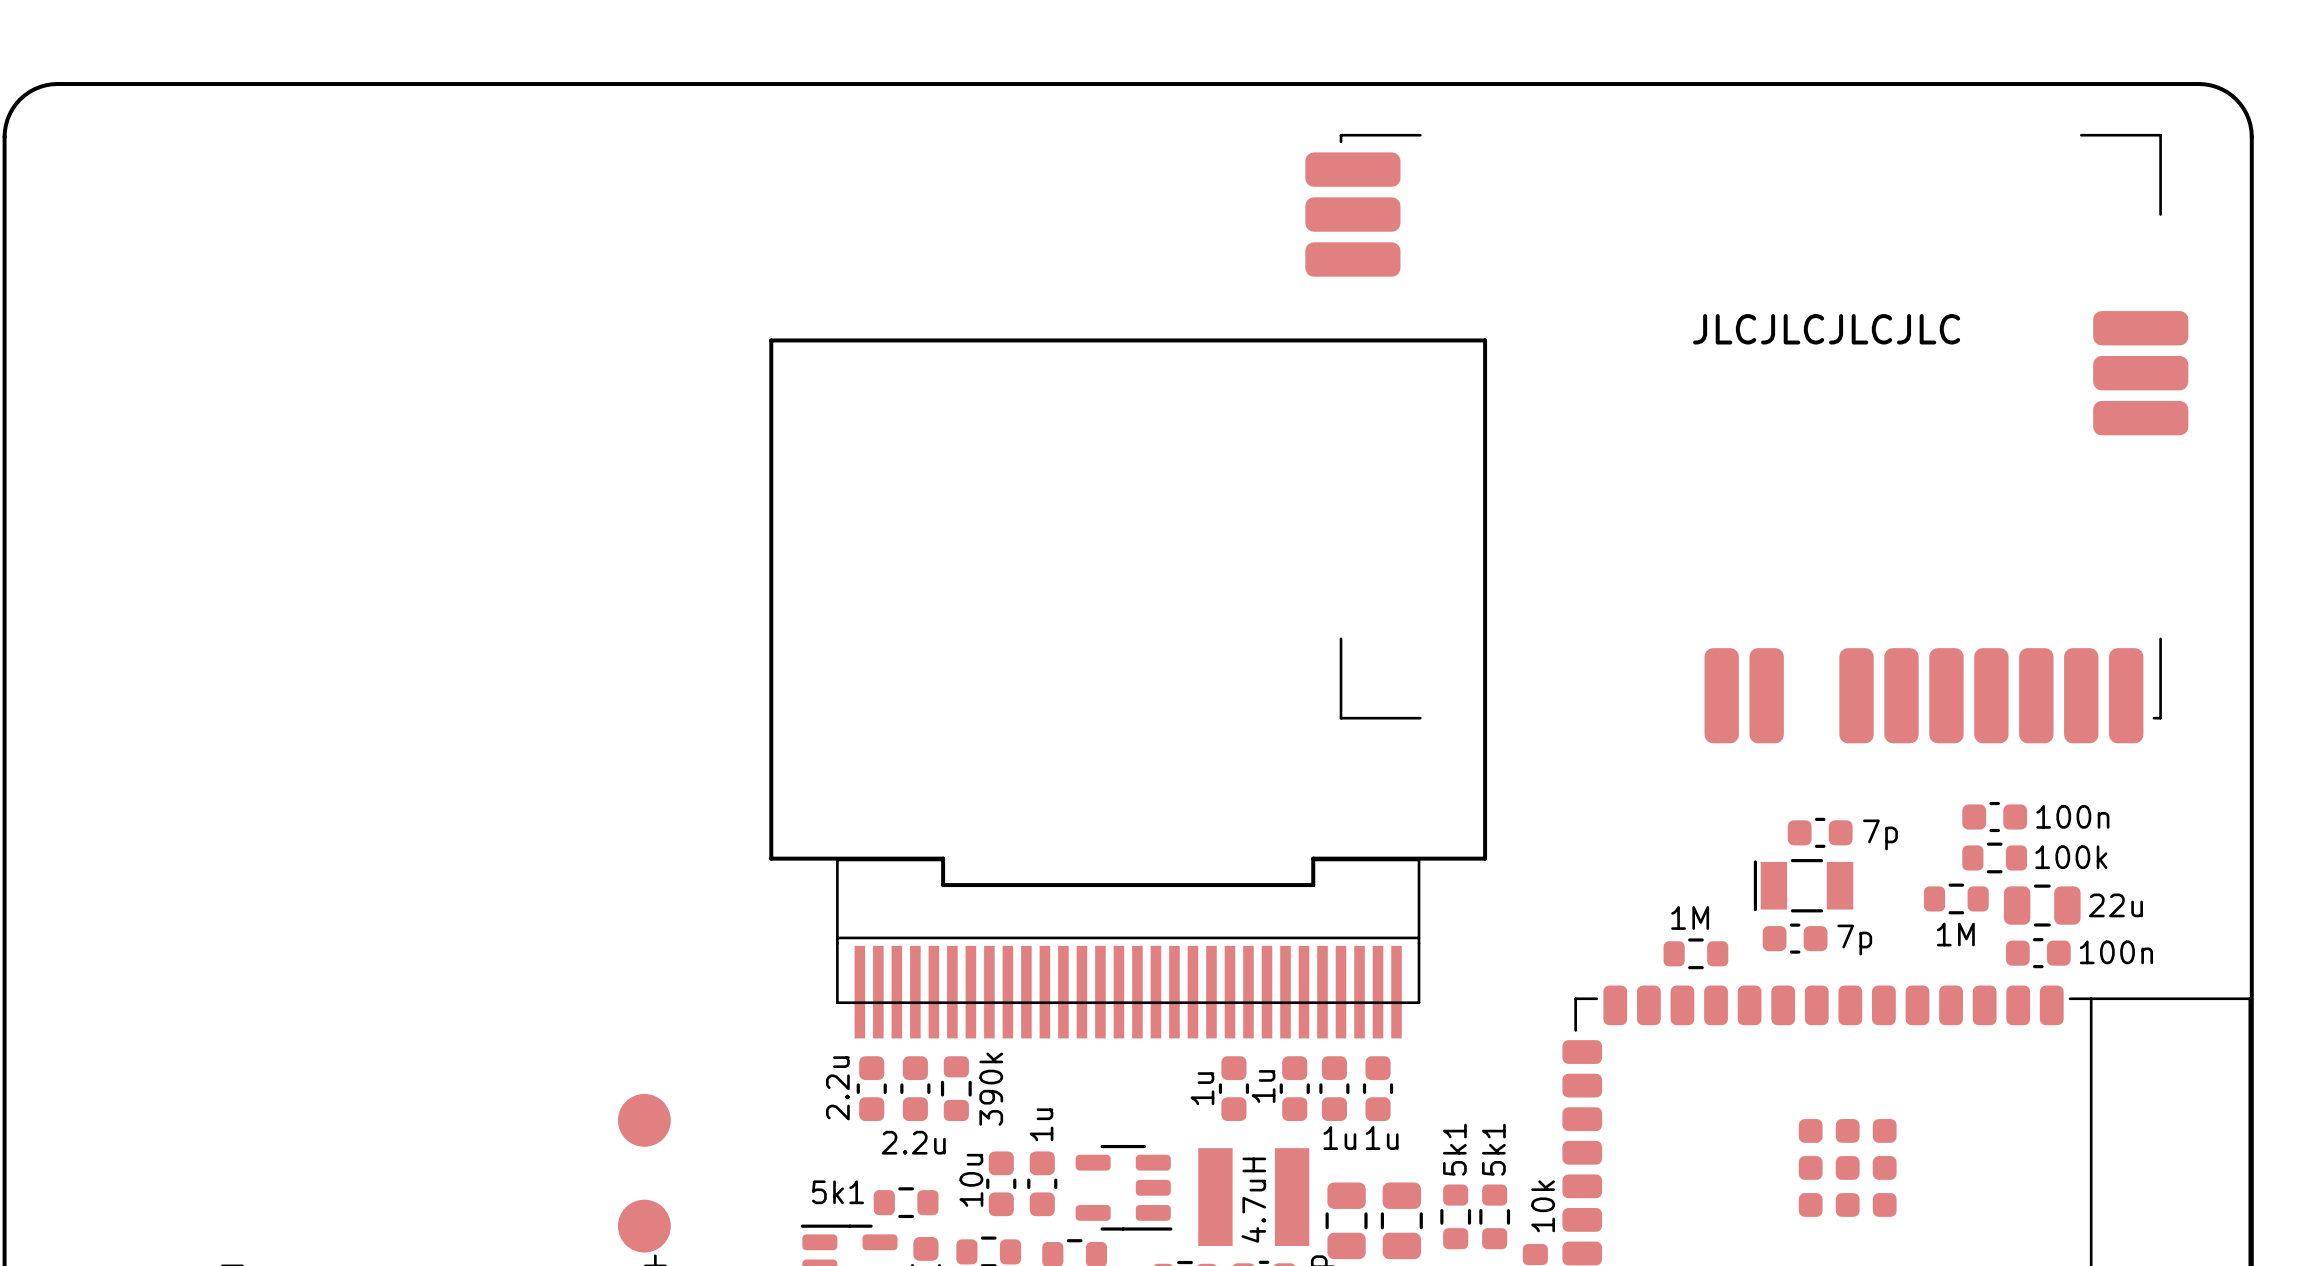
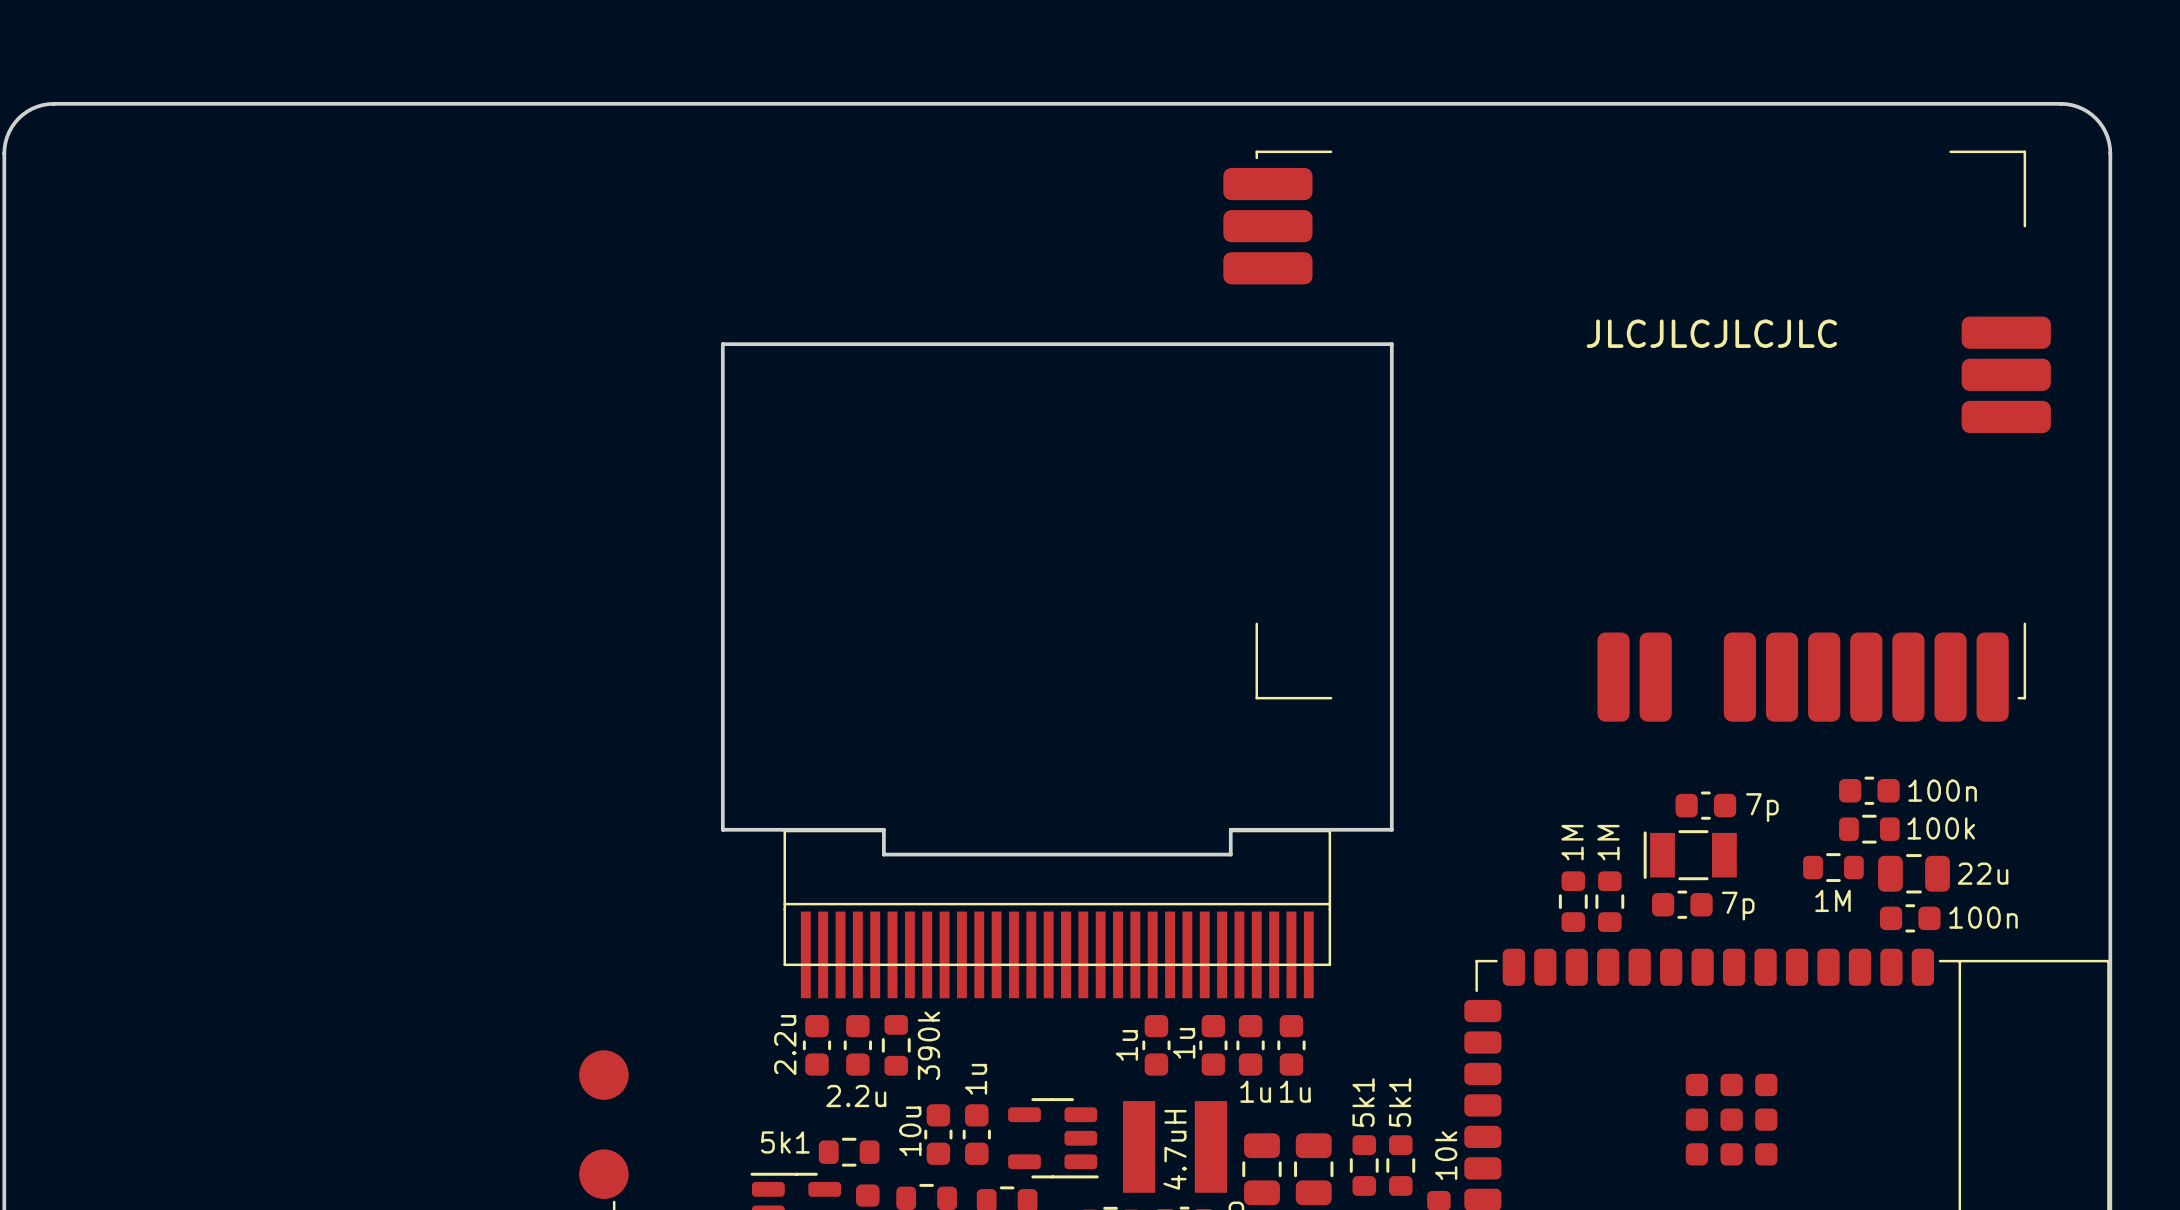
part: none -> 1M (1573, 901)
part: none -> 1M (1609, 901)
part: 1M (1695, 953) -> none

